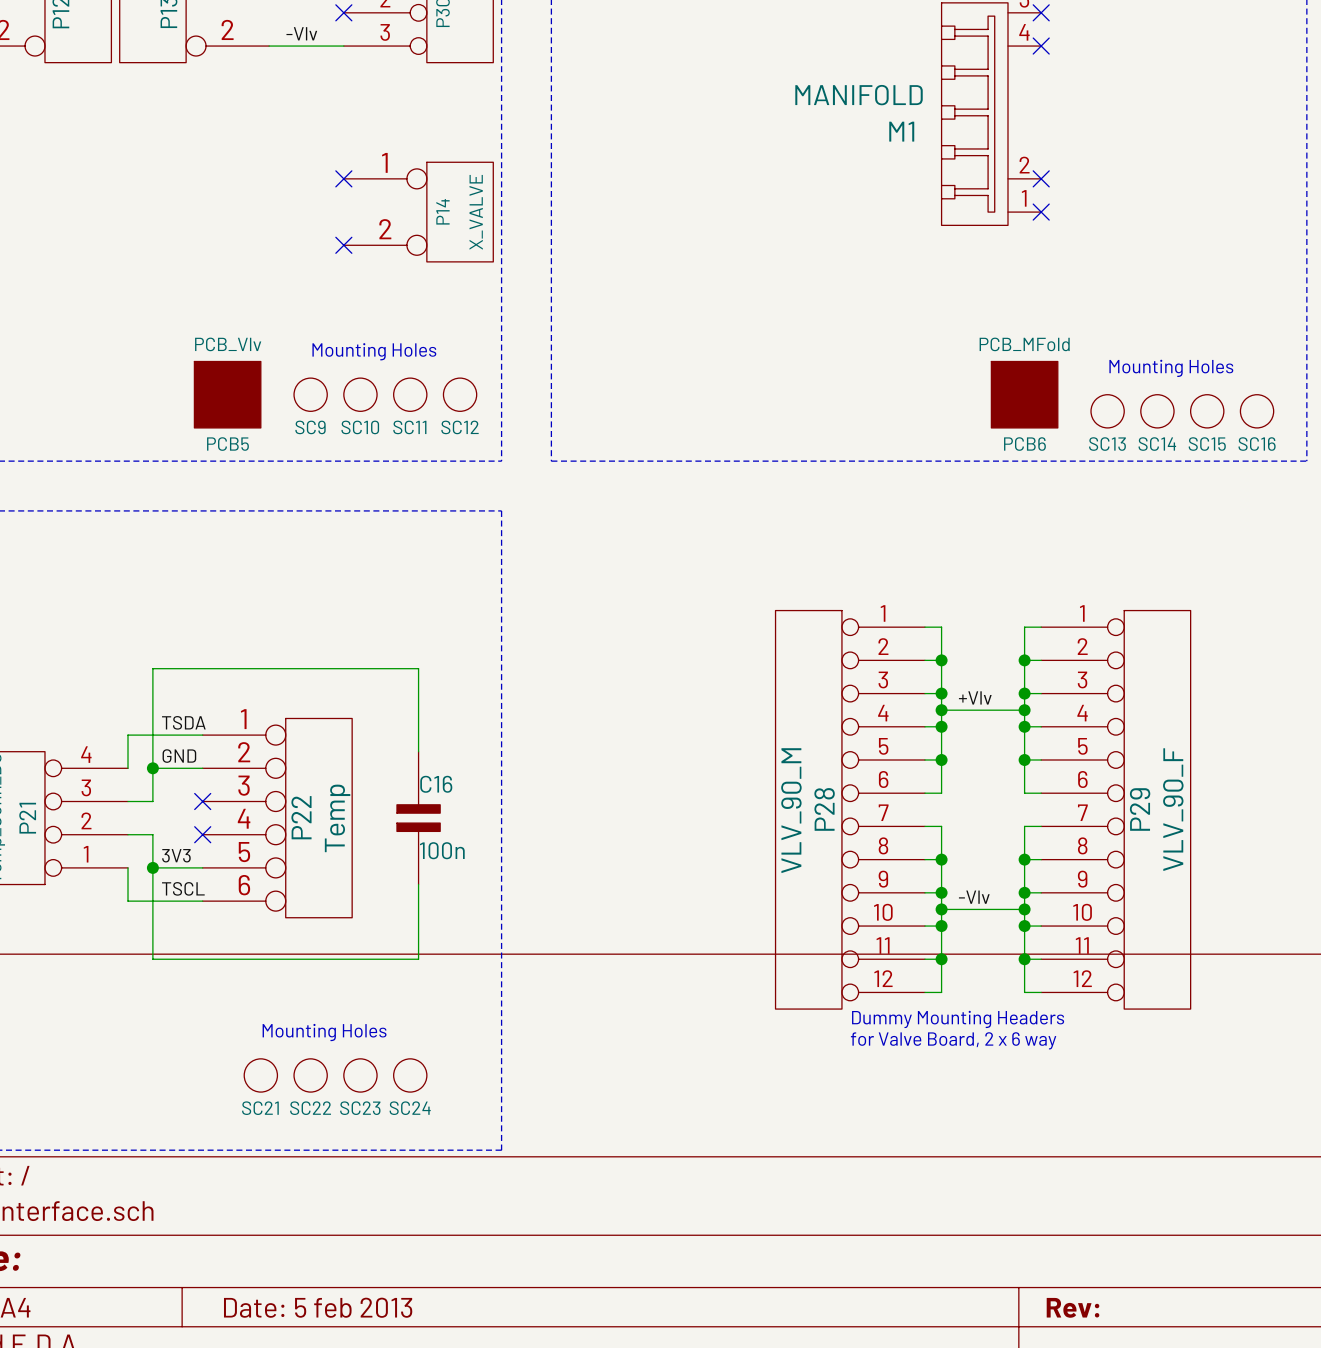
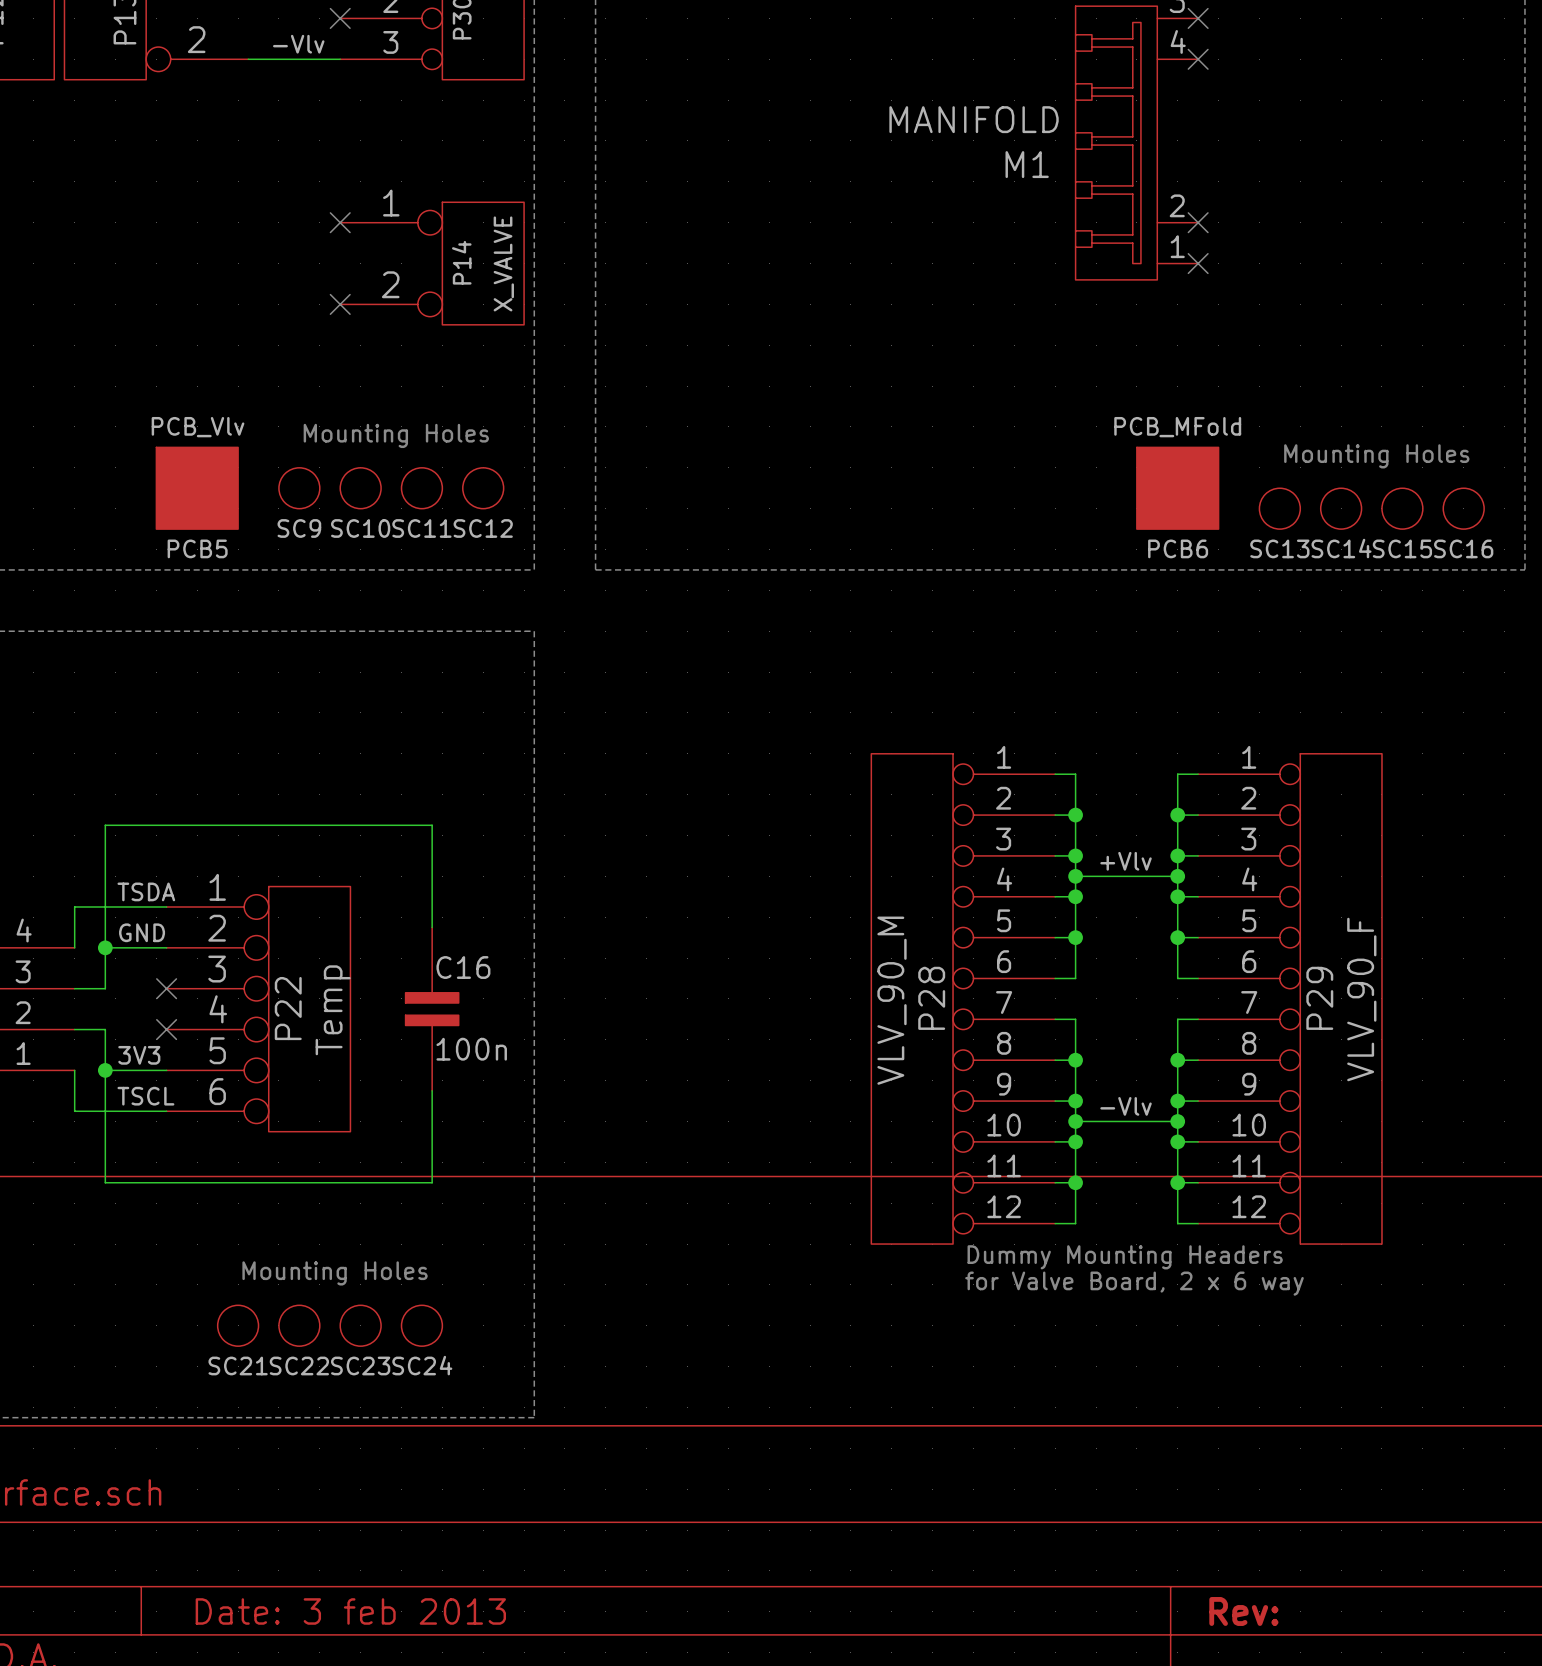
title block: Date: 5 feb 2013 (318, 1307) -> Date: 3 feb 2013 (350, 1611)

